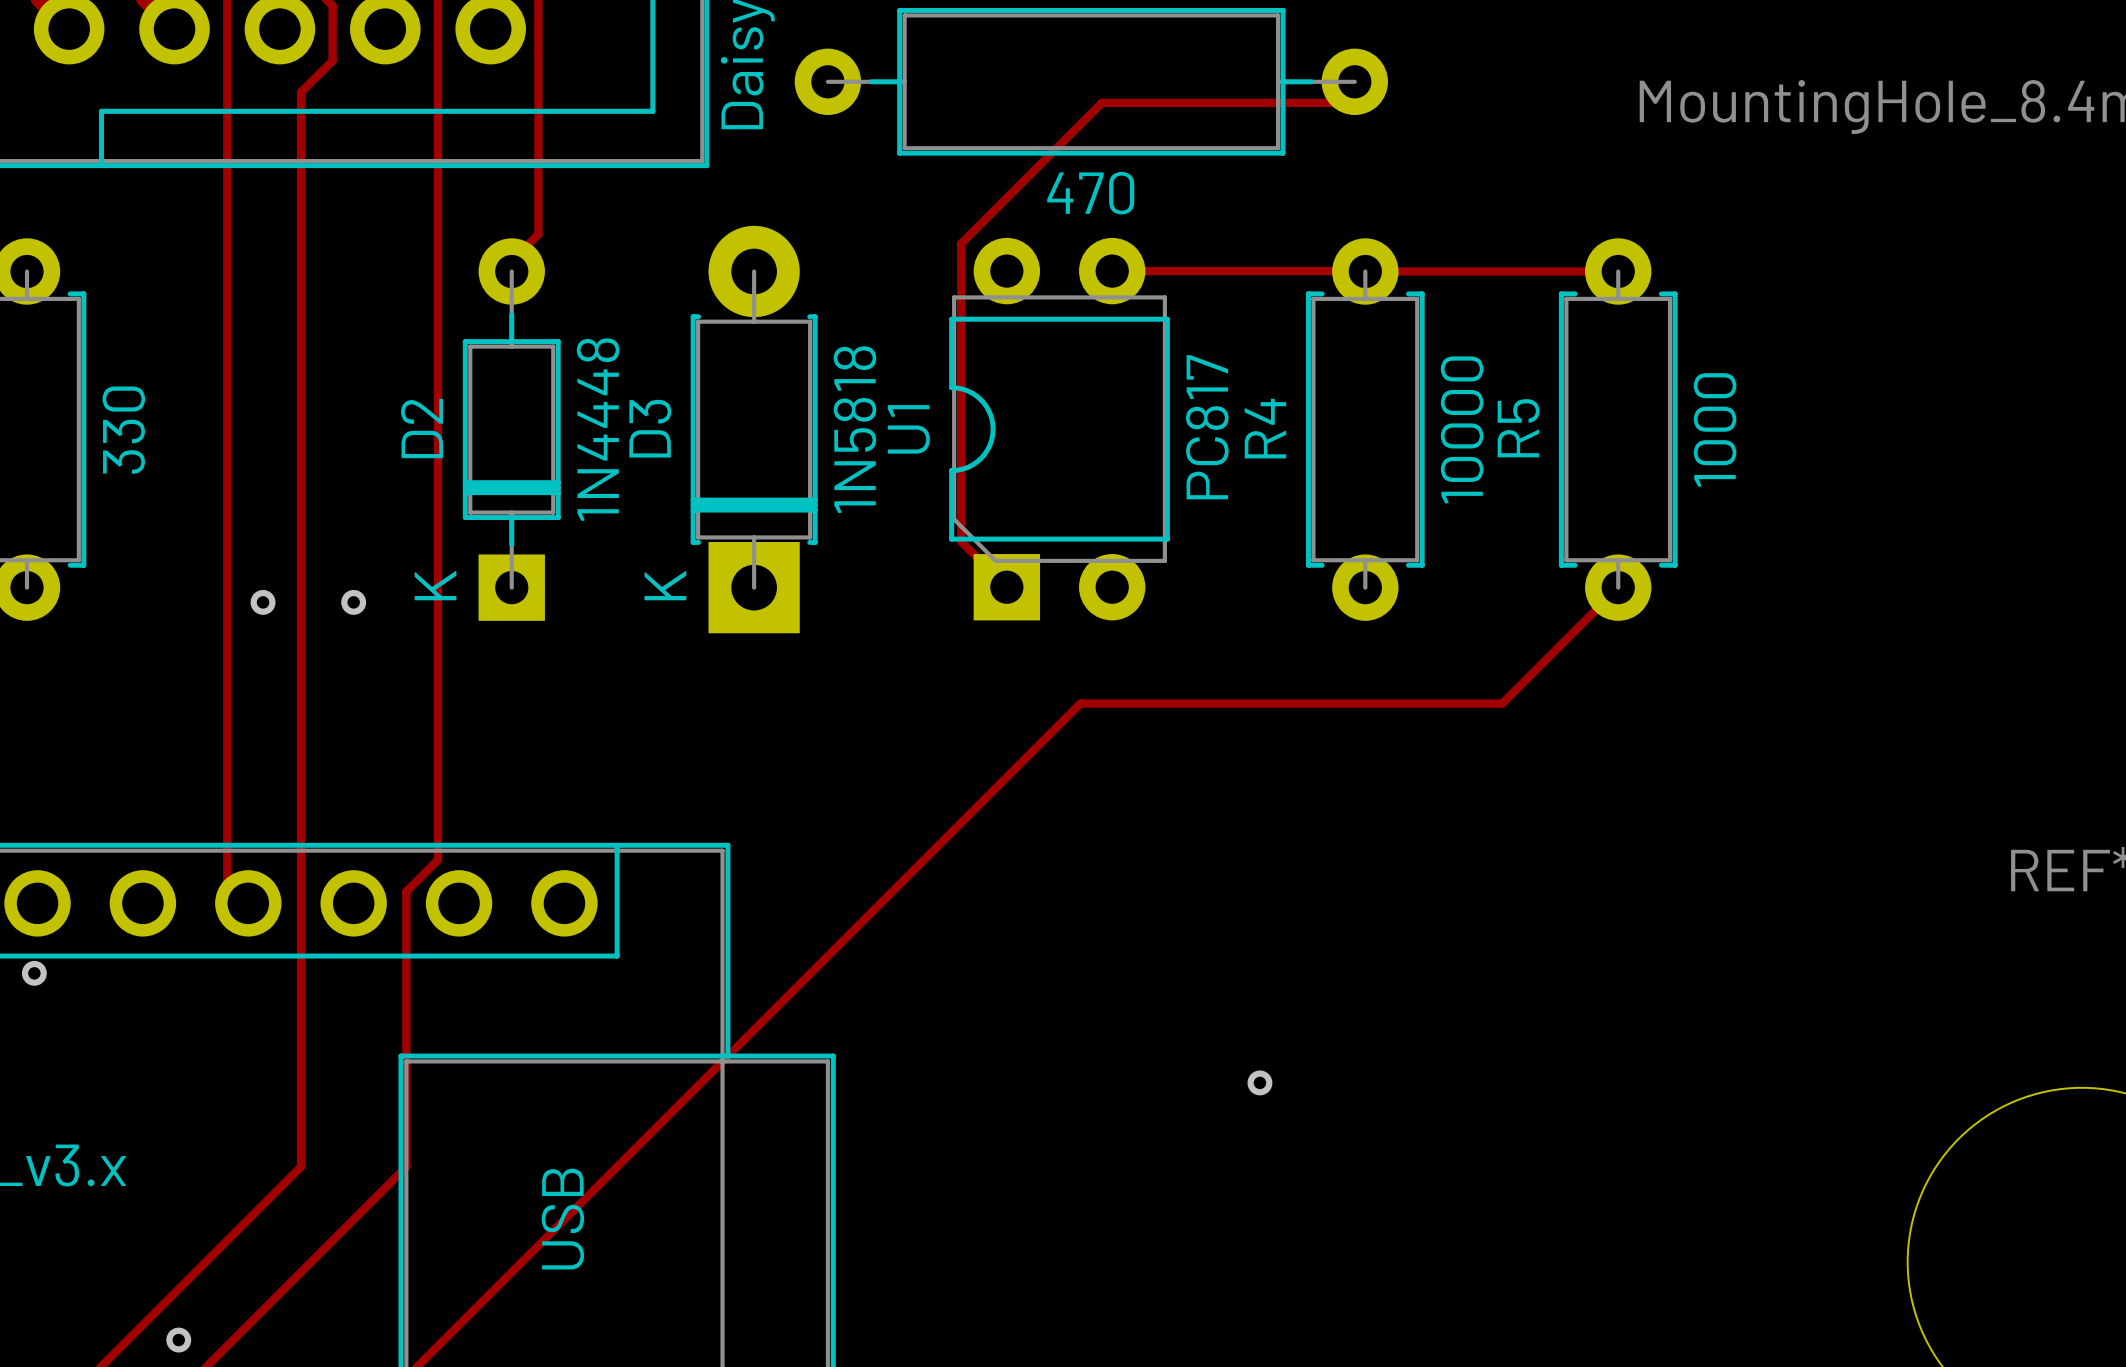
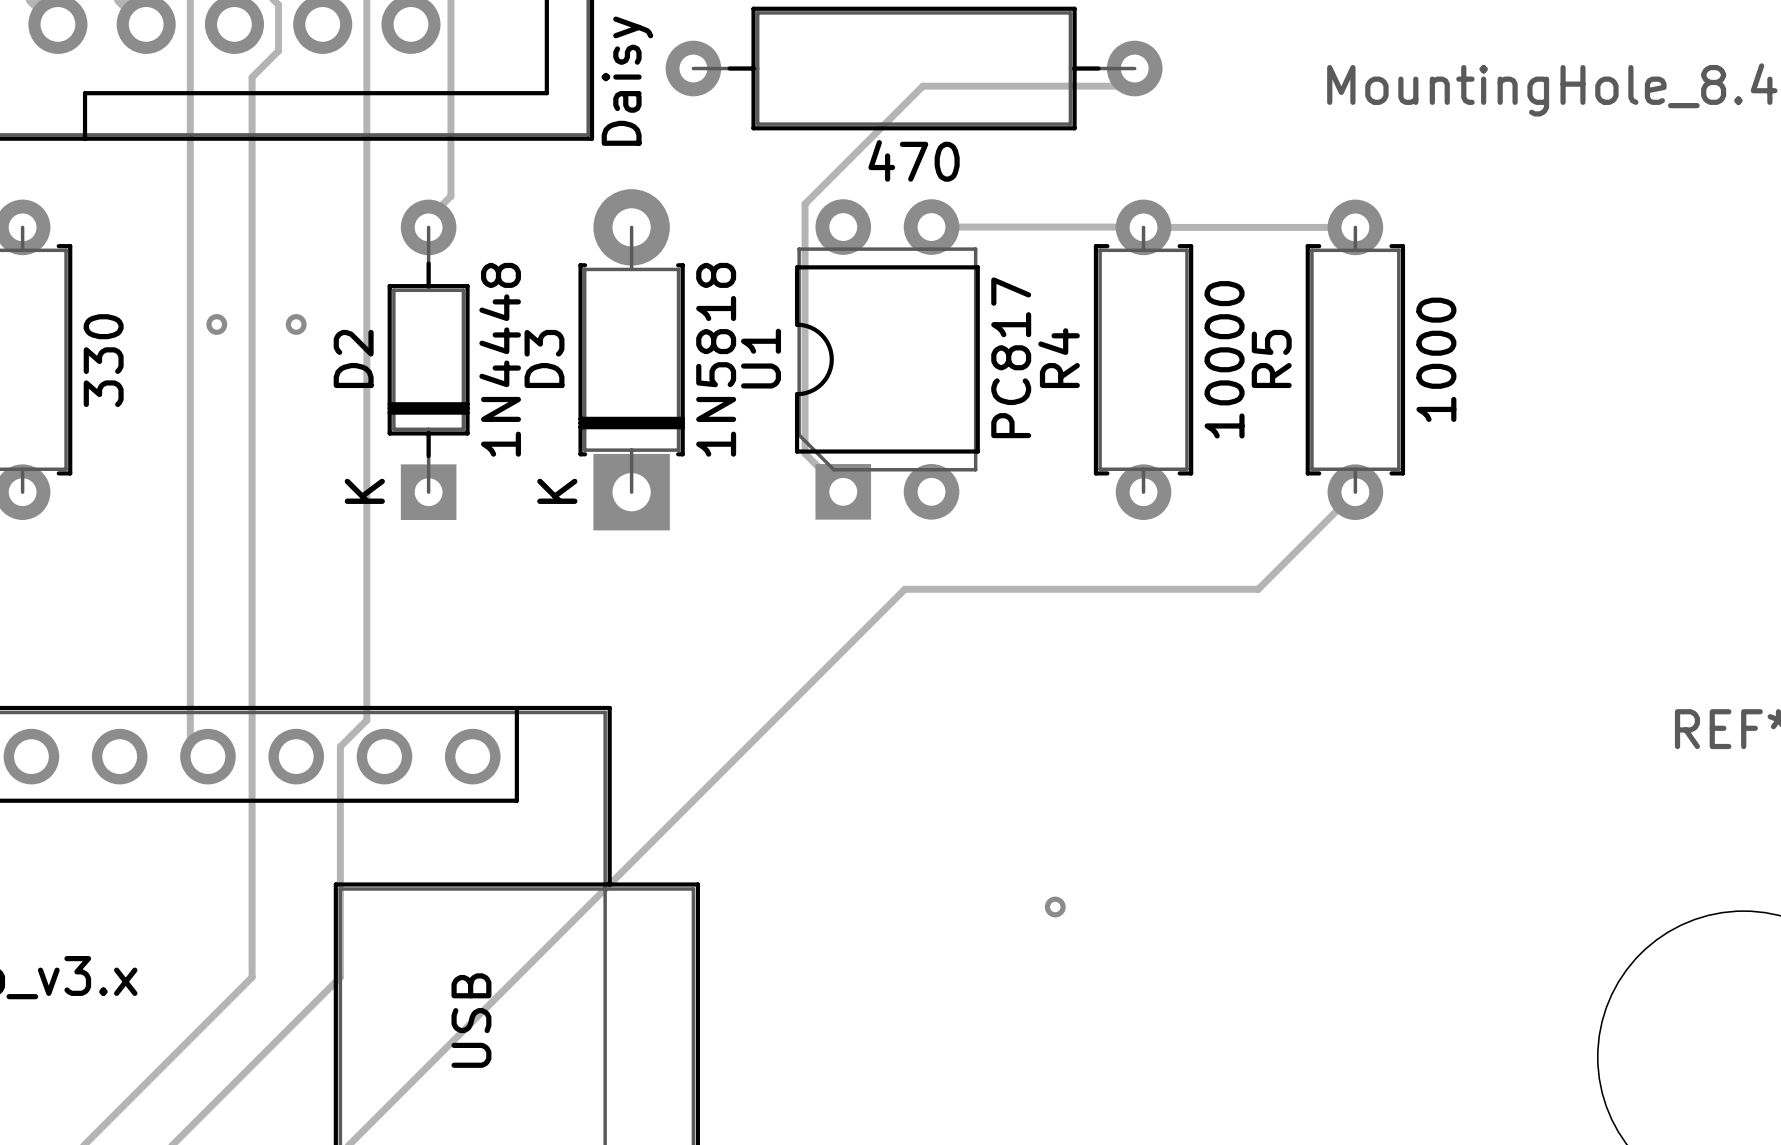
via: none -> (216, 324)
via: none -> (296, 324)
via: (263, 602) -> none
via: (353, 602) -> none
via: (34, 973) -> none
via: (178, 1340) -> none

